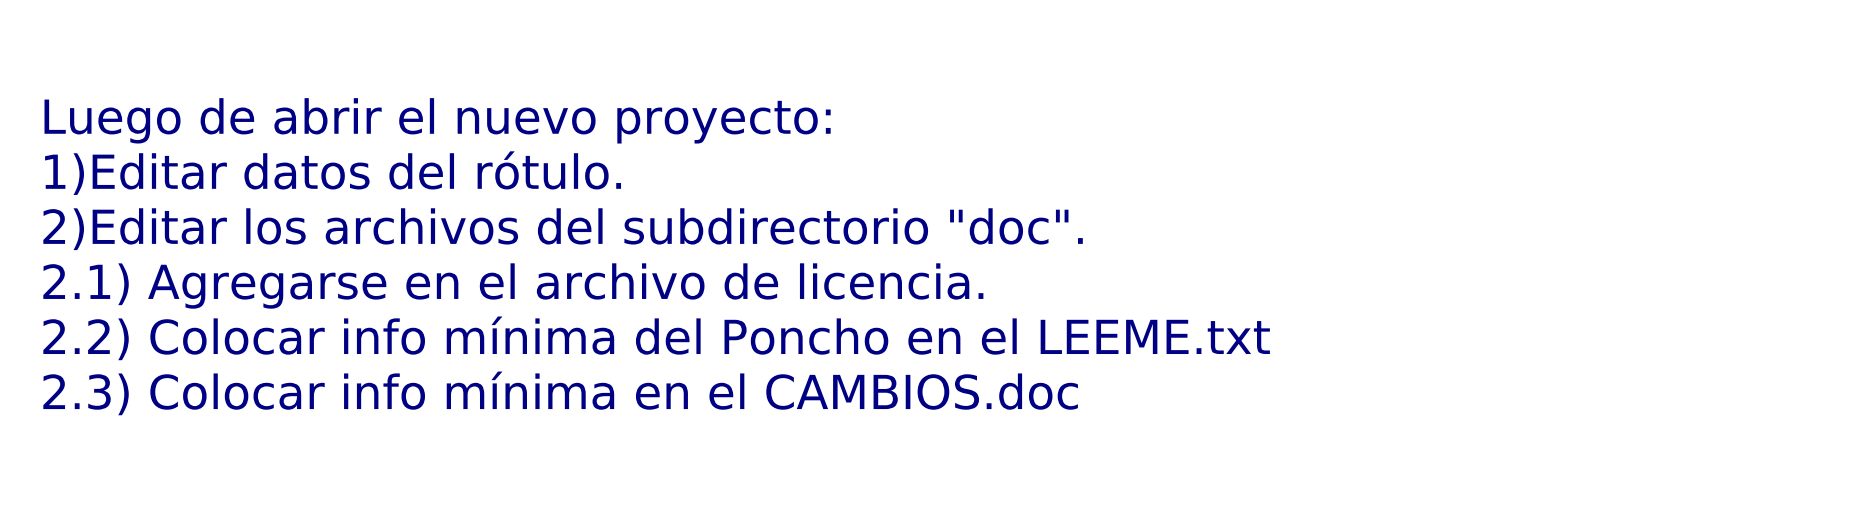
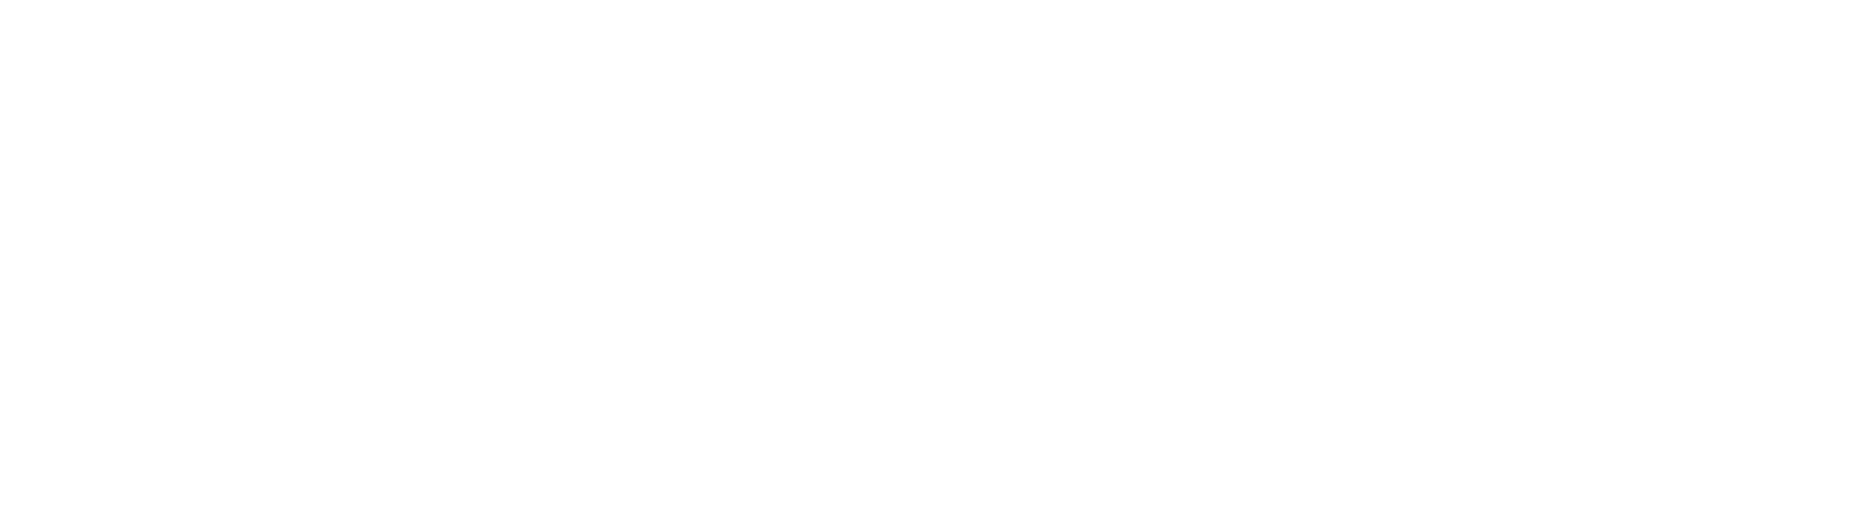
text: Luego de abrir el nuevo proyecto: (437, 120) -> none
text: 1)Editar datos del rótulo. (333, 173) -> none
text: 2)Editar los archivos del subdirectorio "doc". (563, 229) -> none
text: 2.1) Agregarse en el archivo de licencia. (513, 286) -> none
text: 2.2) Colocar info mínima del Poncho en el LEEME.txt (656, 338) -> none
text: 2.3) Colocar info mínima en el CAMBIOS.doc (560, 393) -> none

